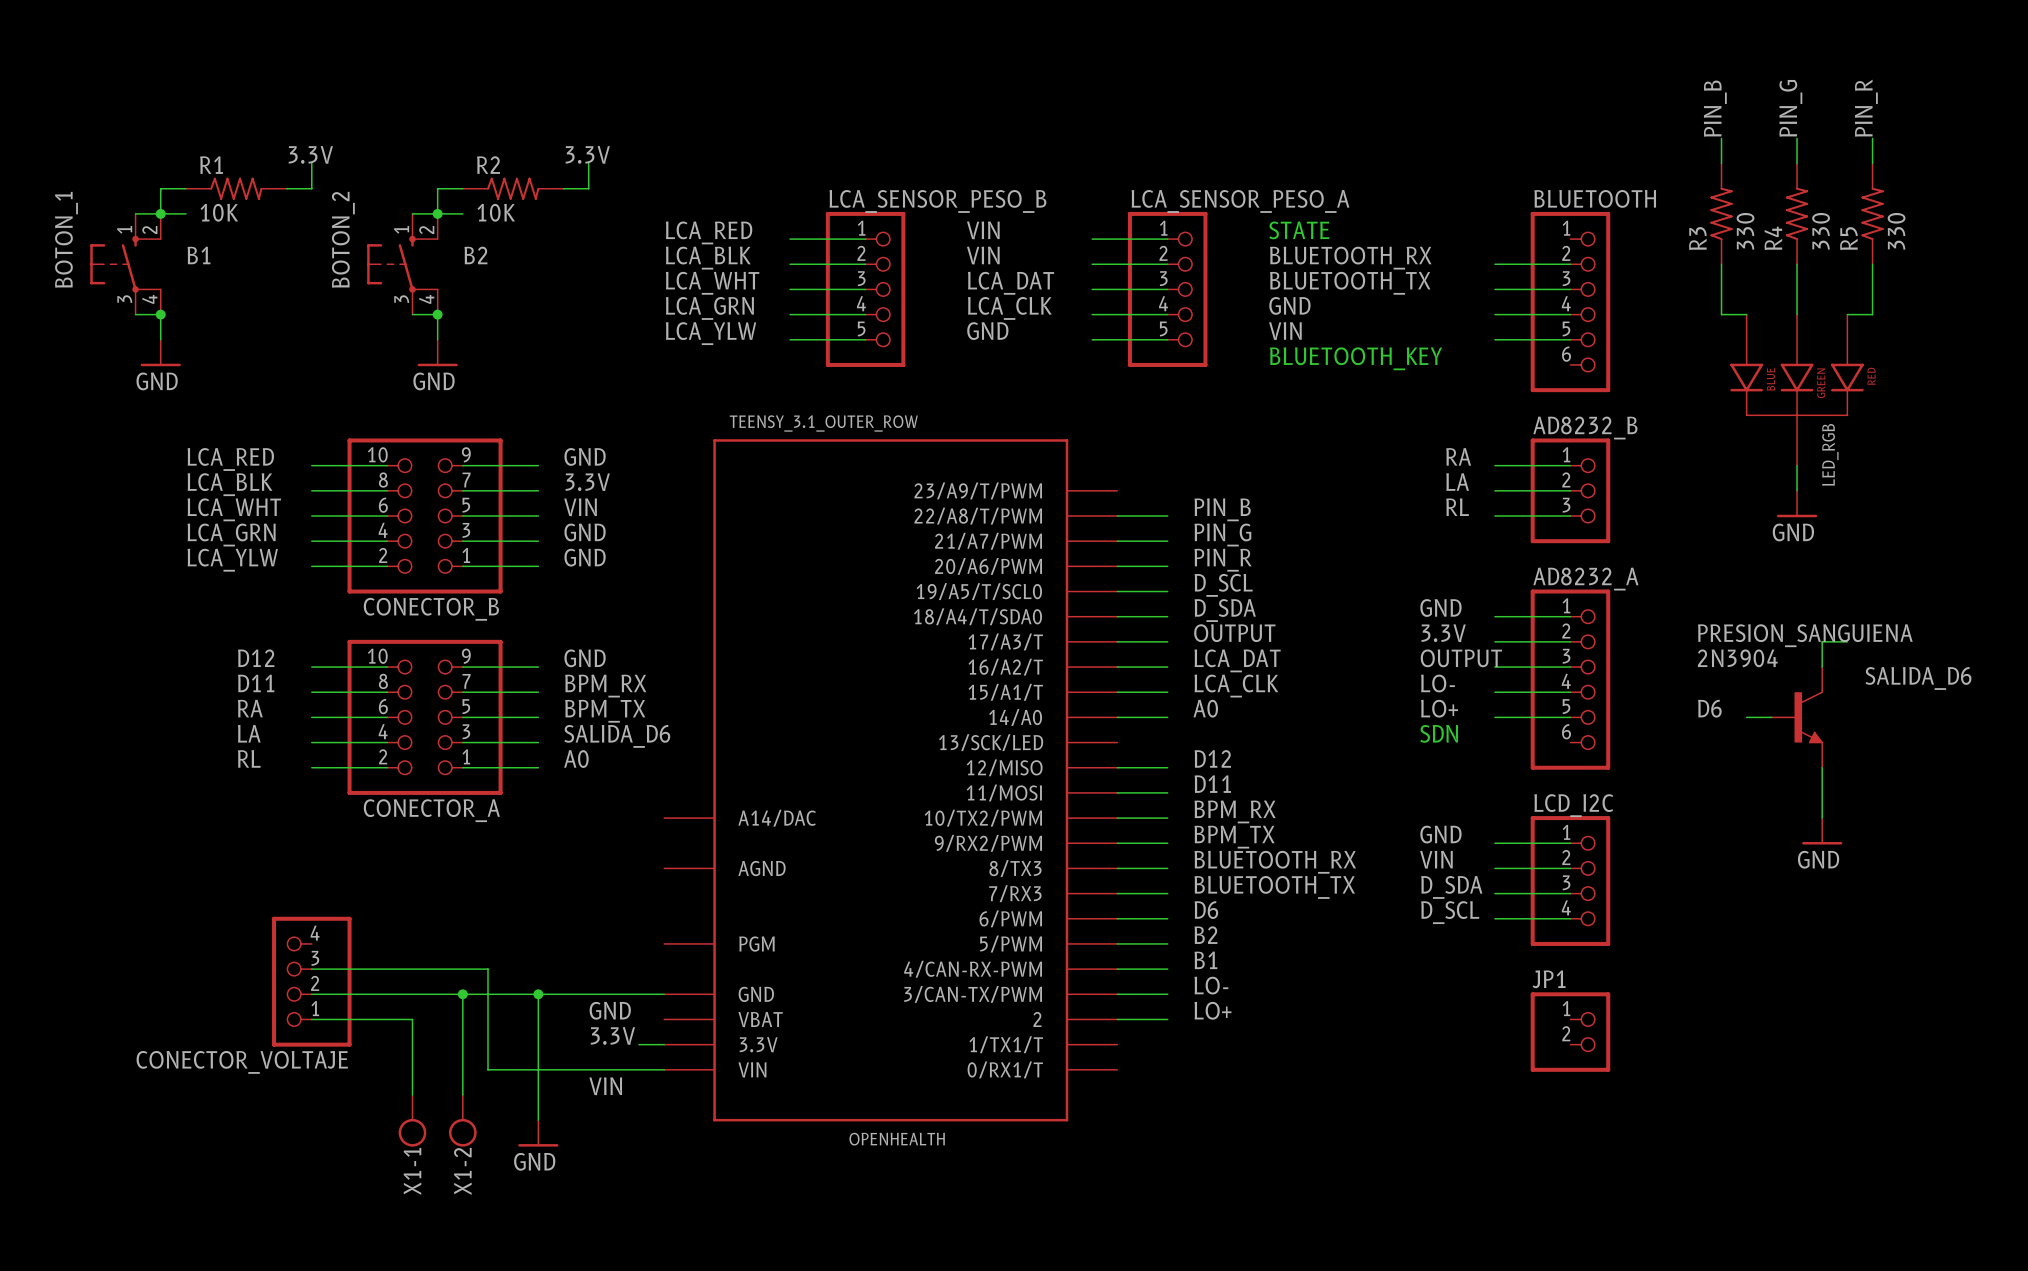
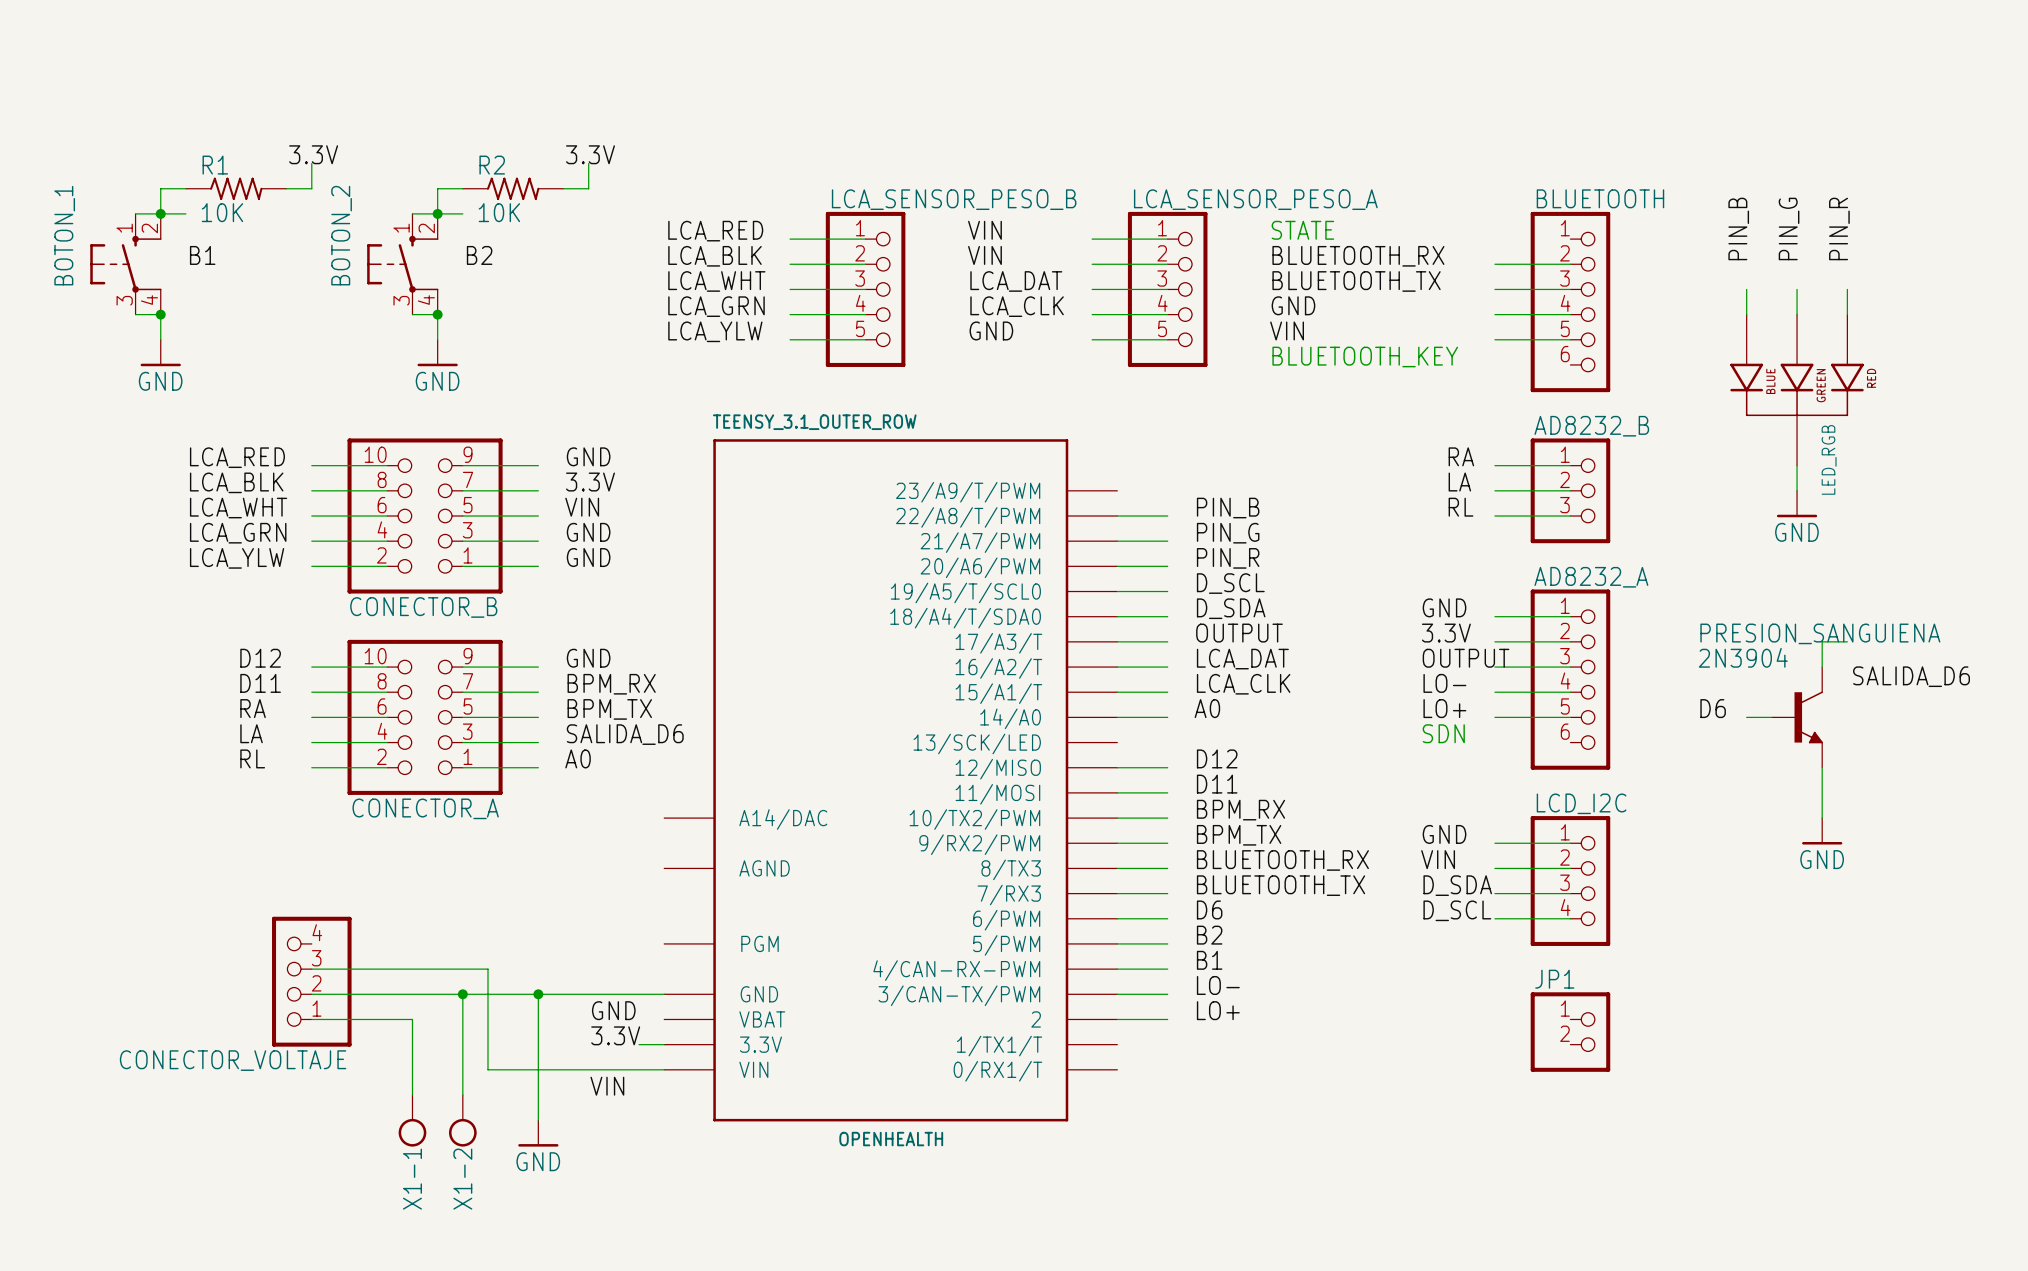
label position: PIN_B (1715, 108) -> PIN_B (1738, 228)
label position: PIN_G (1790, 108) -> PIN_G (1789, 228)
label position: PIN_R (1866, 108) -> PIN_R (1839, 228)
wire: (1721, 138) (1721, 163) -> none
wire: (1797, 138) (1797, 163) -> none
wire: (1872, 138) (1872, 163) -> none
R3: 330 (1721, 213) -> none
R4: 330 (1797, 213) -> none
R5: 330 (1872, 213) -> none
wire: (1721, 264) (1721, 314) (1746, 314) -> (1746, 289) (1746, 314)
wire: (1797, 264) (1797, 289) -> none
wire: (1872, 264) (1872, 314) (1847, 314) -> (1847, 289) (1847, 314)

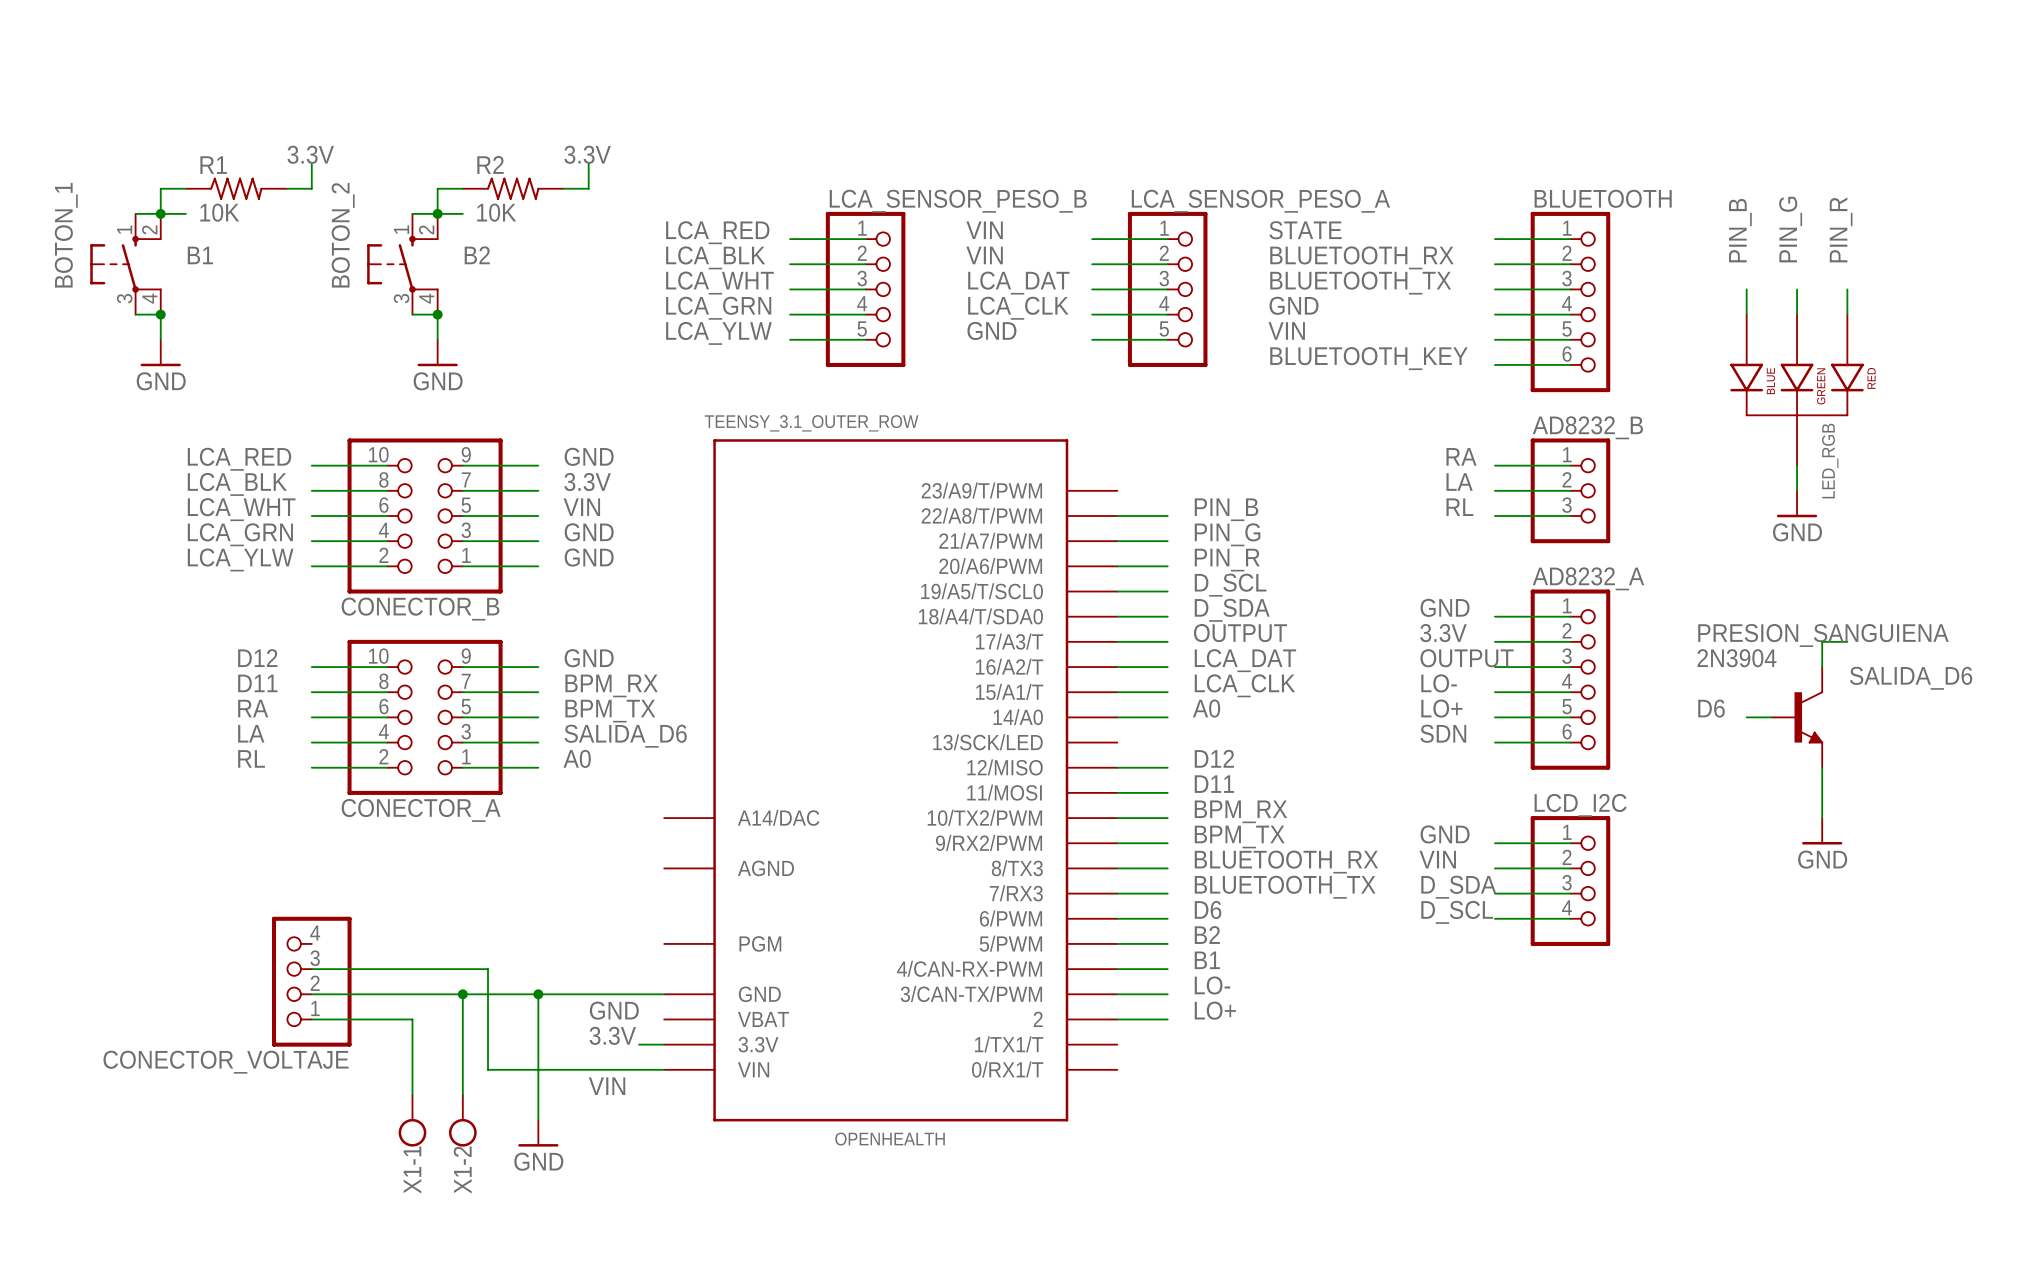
text: STATE (1302, 230) -> none
label: none -> STATE (1305, 230)
wire: none -> (1494, 239) (1570, 239)
text: BLUETOOTH_KEY (1365, 356) -> none
label: none -> BLUETOOTH_KEY (1368, 358)
wire: none -> (1494, 364) (1570, 364)
text: SDN (1443, 733) -> none
label: none -> SDN (1443, 733)
wire: none -> (1494, 742) (1570, 742)
JP1: (1570, 1032) -> none

